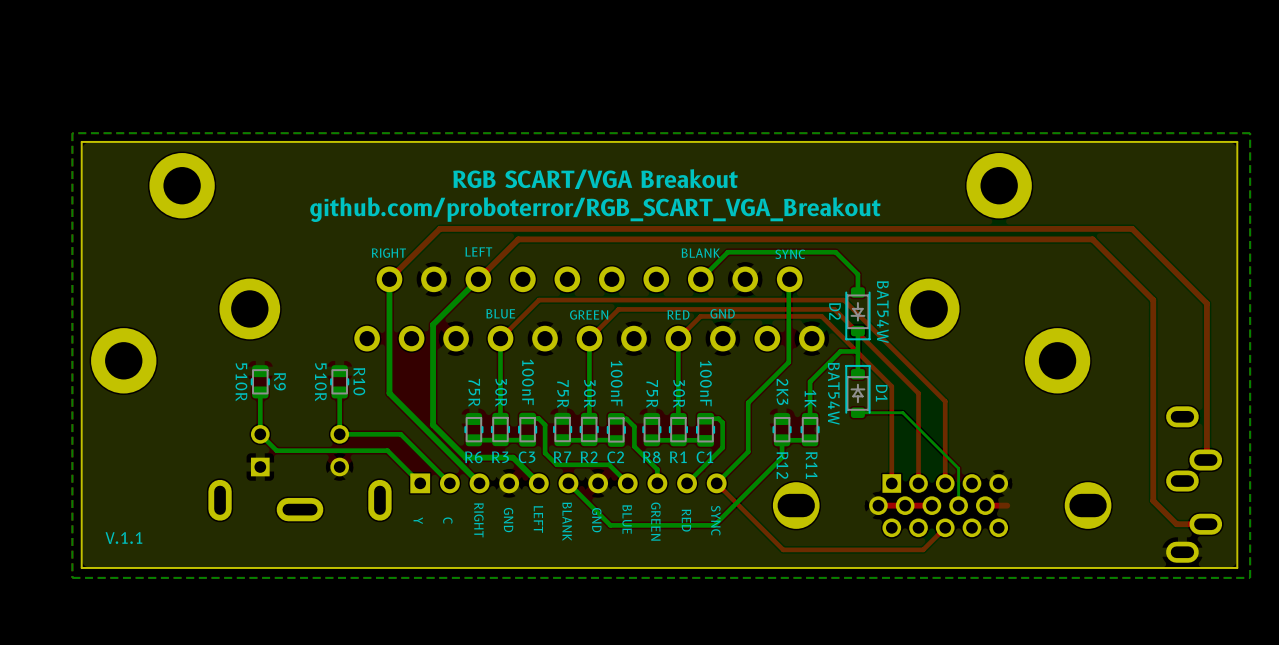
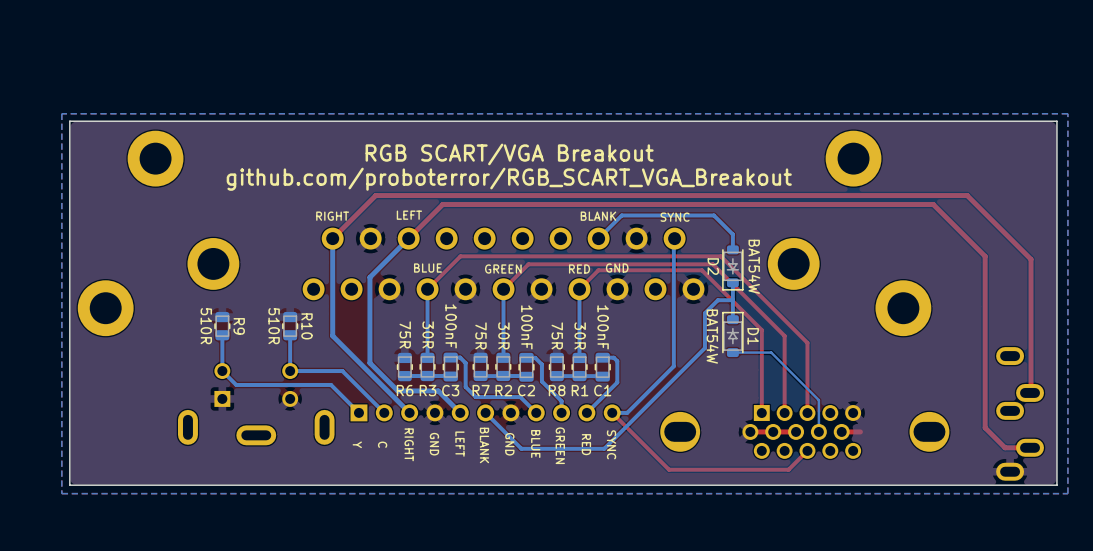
bottom track: (788, 362) (748, 402) (748, 451) (716, 483) -> (673, 309) (673, 366) (627, 412) (612, 412)
bottom track: (825, 366) (810, 381) (810, 419) -> none
R12: 2K3 (782, 429) -> none
R11: 1K (810, 429) -> none
bottom track: (810, 440) (782, 440) (782, 457) (714, 525) (707, 525) -> (704, 313) (704, 348) (604, 448)
text: V.1.1 (123, 538) -> none

